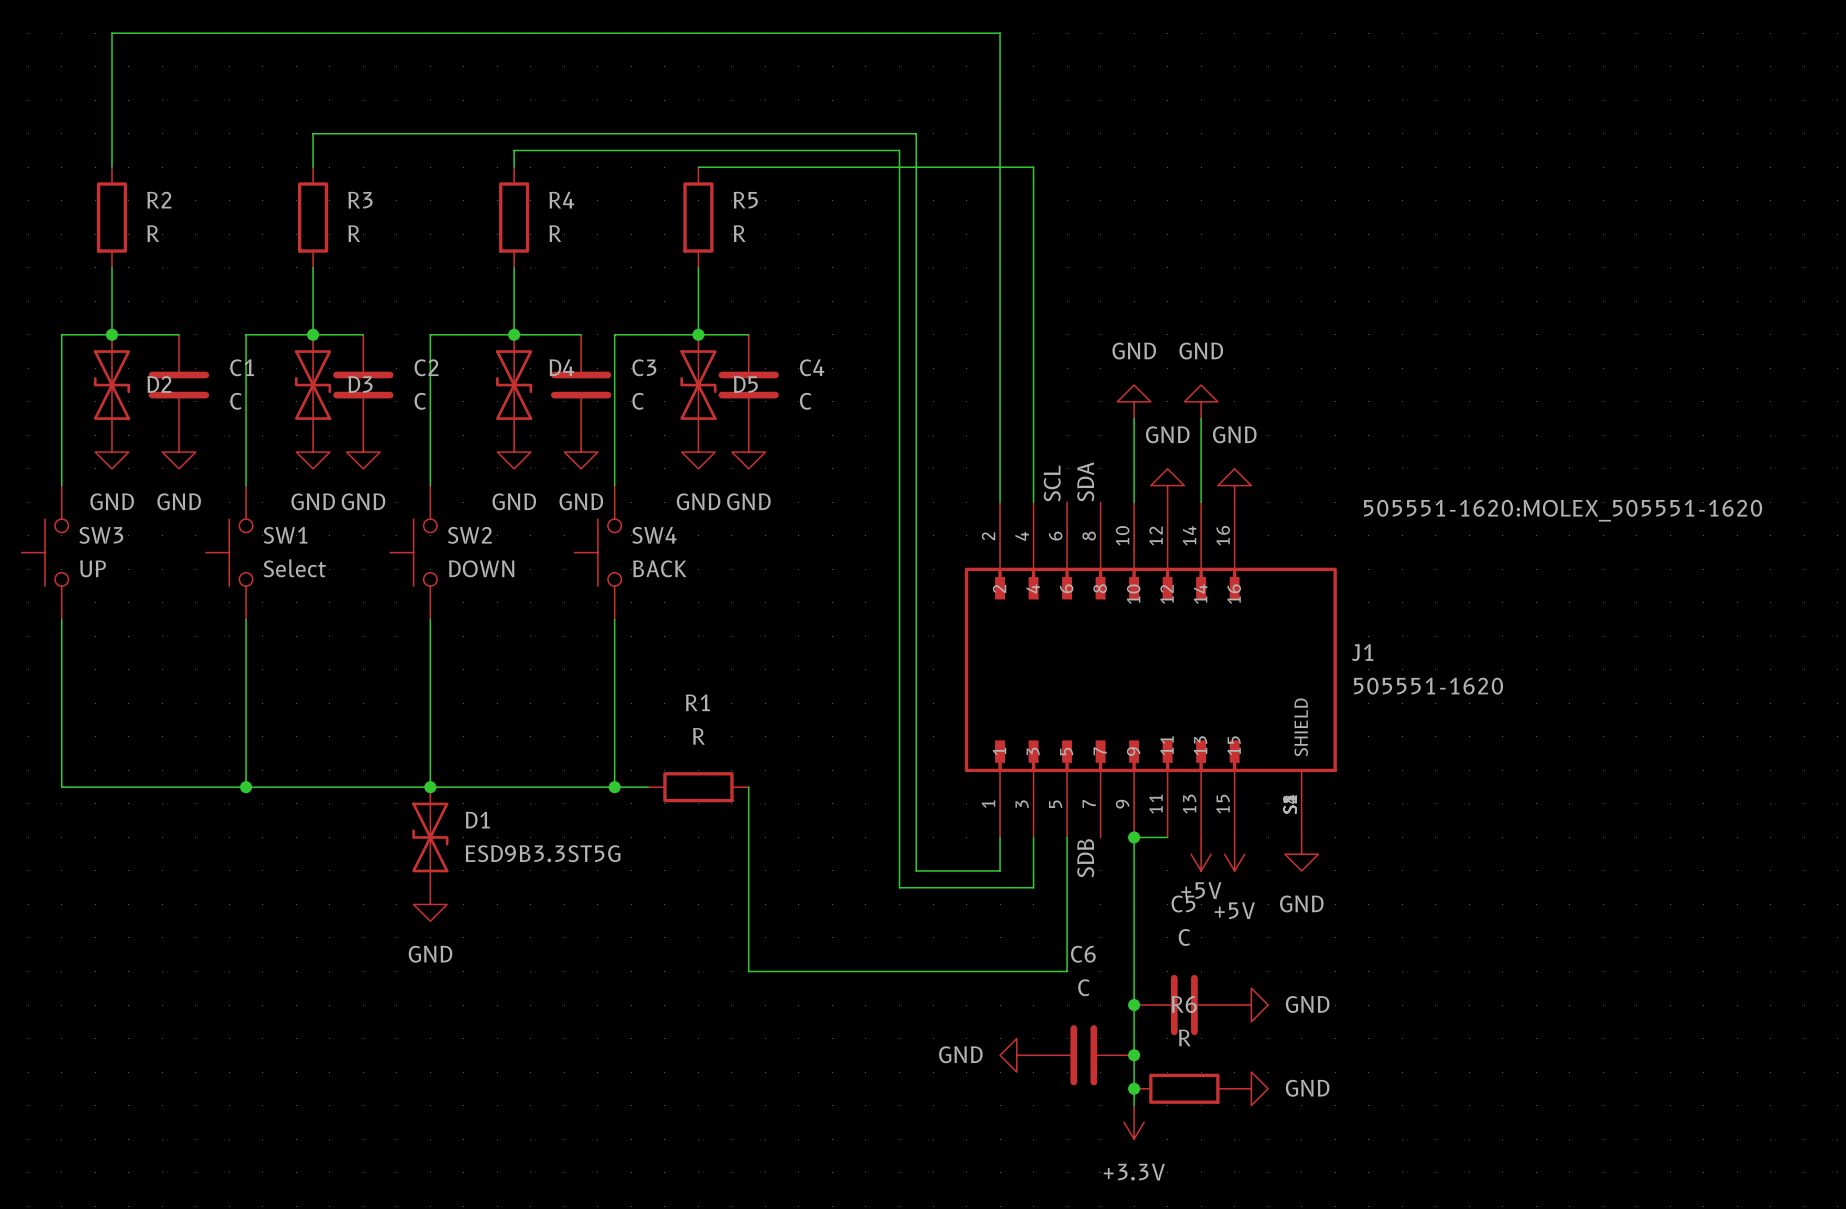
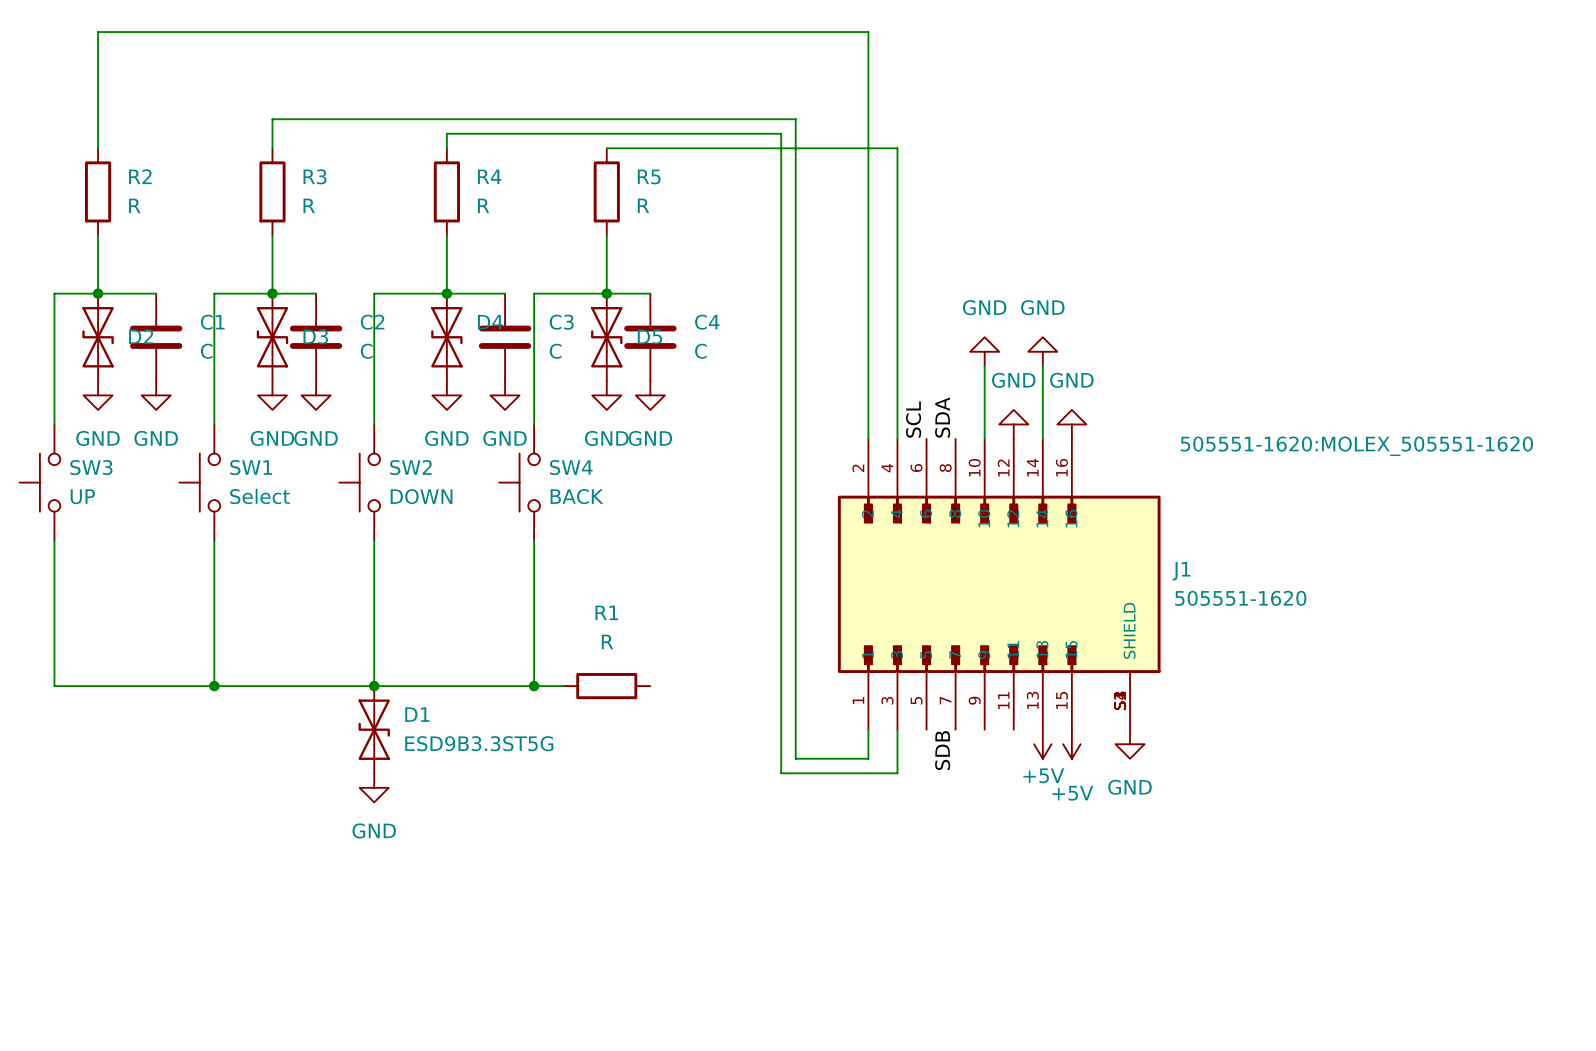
wire: (748, 787) (748, 971) (1067, 971) (1067, 837) -> none
junction: (1134, 837) -> none
wire: (1167, 837) (1134, 837) (1134, 1105) -> none
junction: (1134, 1005) -> none
C5: C (1184, 1005) -> none
power symbol: GND (1251, 1005) -> none
power symbol: GND (1016, 1055) -> none
C6: C (1083, 1055) -> none
junction: (1134, 1055) -> none
junction: (1134, 1088) -> none
R6: R (1184, 1088) -> none
power symbol: GND (1251, 1088) -> none
power symbol: +3.3V (1134, 1122) -> none

